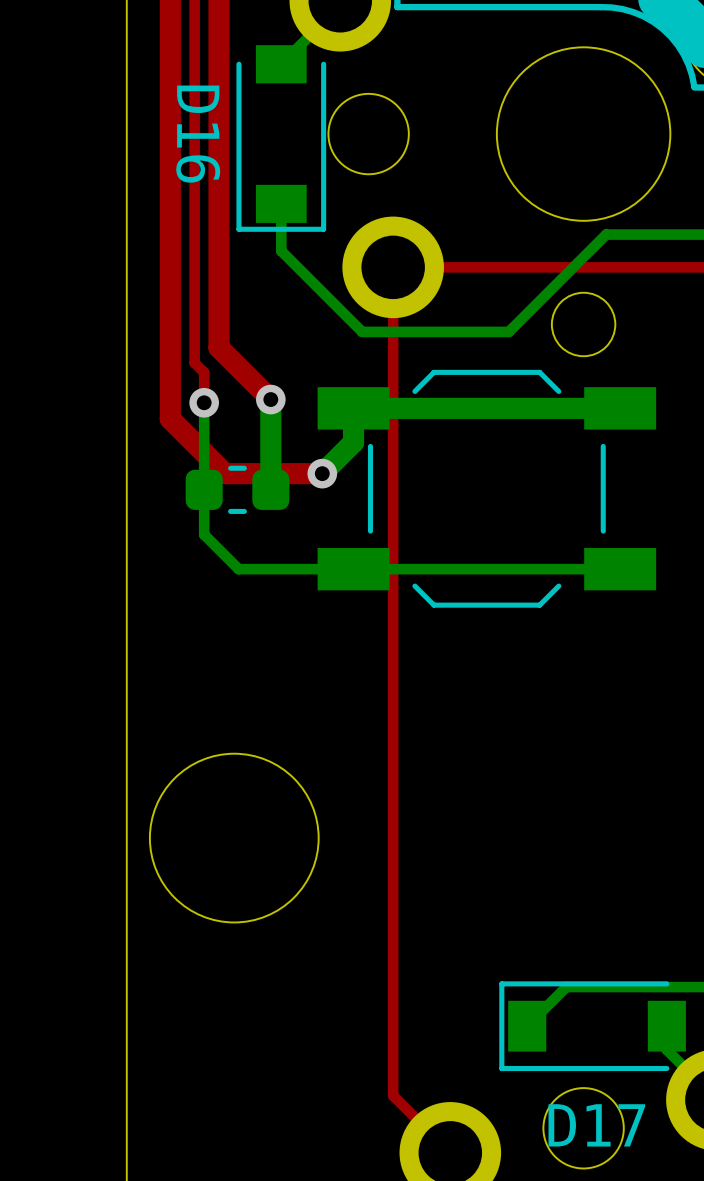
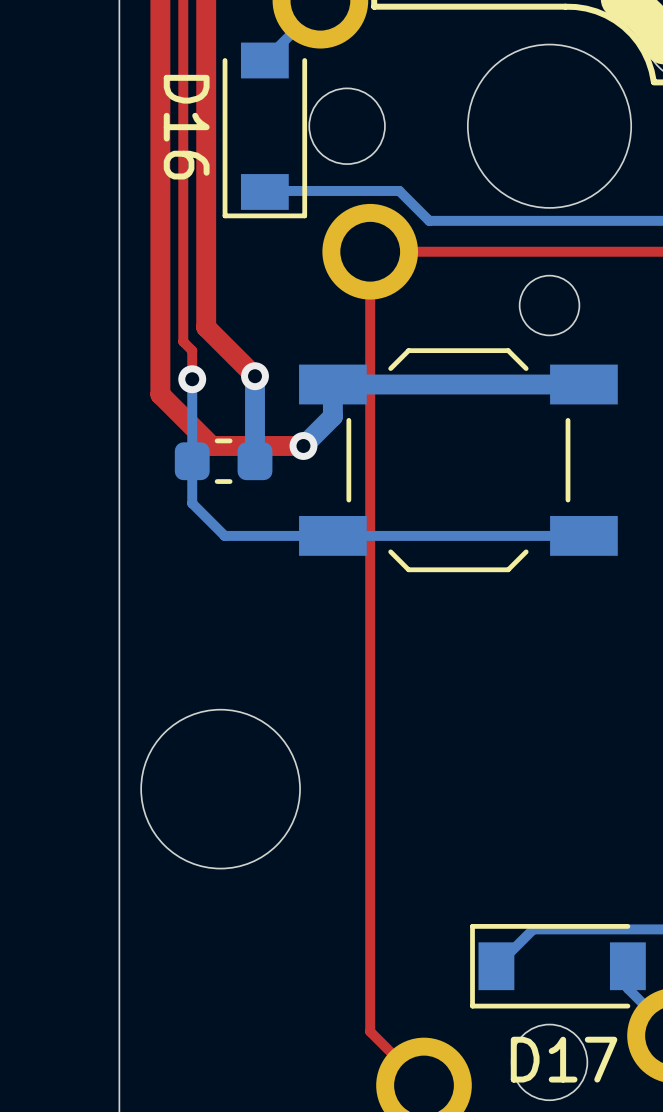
bottom track: (281, 203) (281, 250) (362, 331) (508, 331) (606, 234) -> (264, 191) (399, 190) (429, 220) (570, 220)

